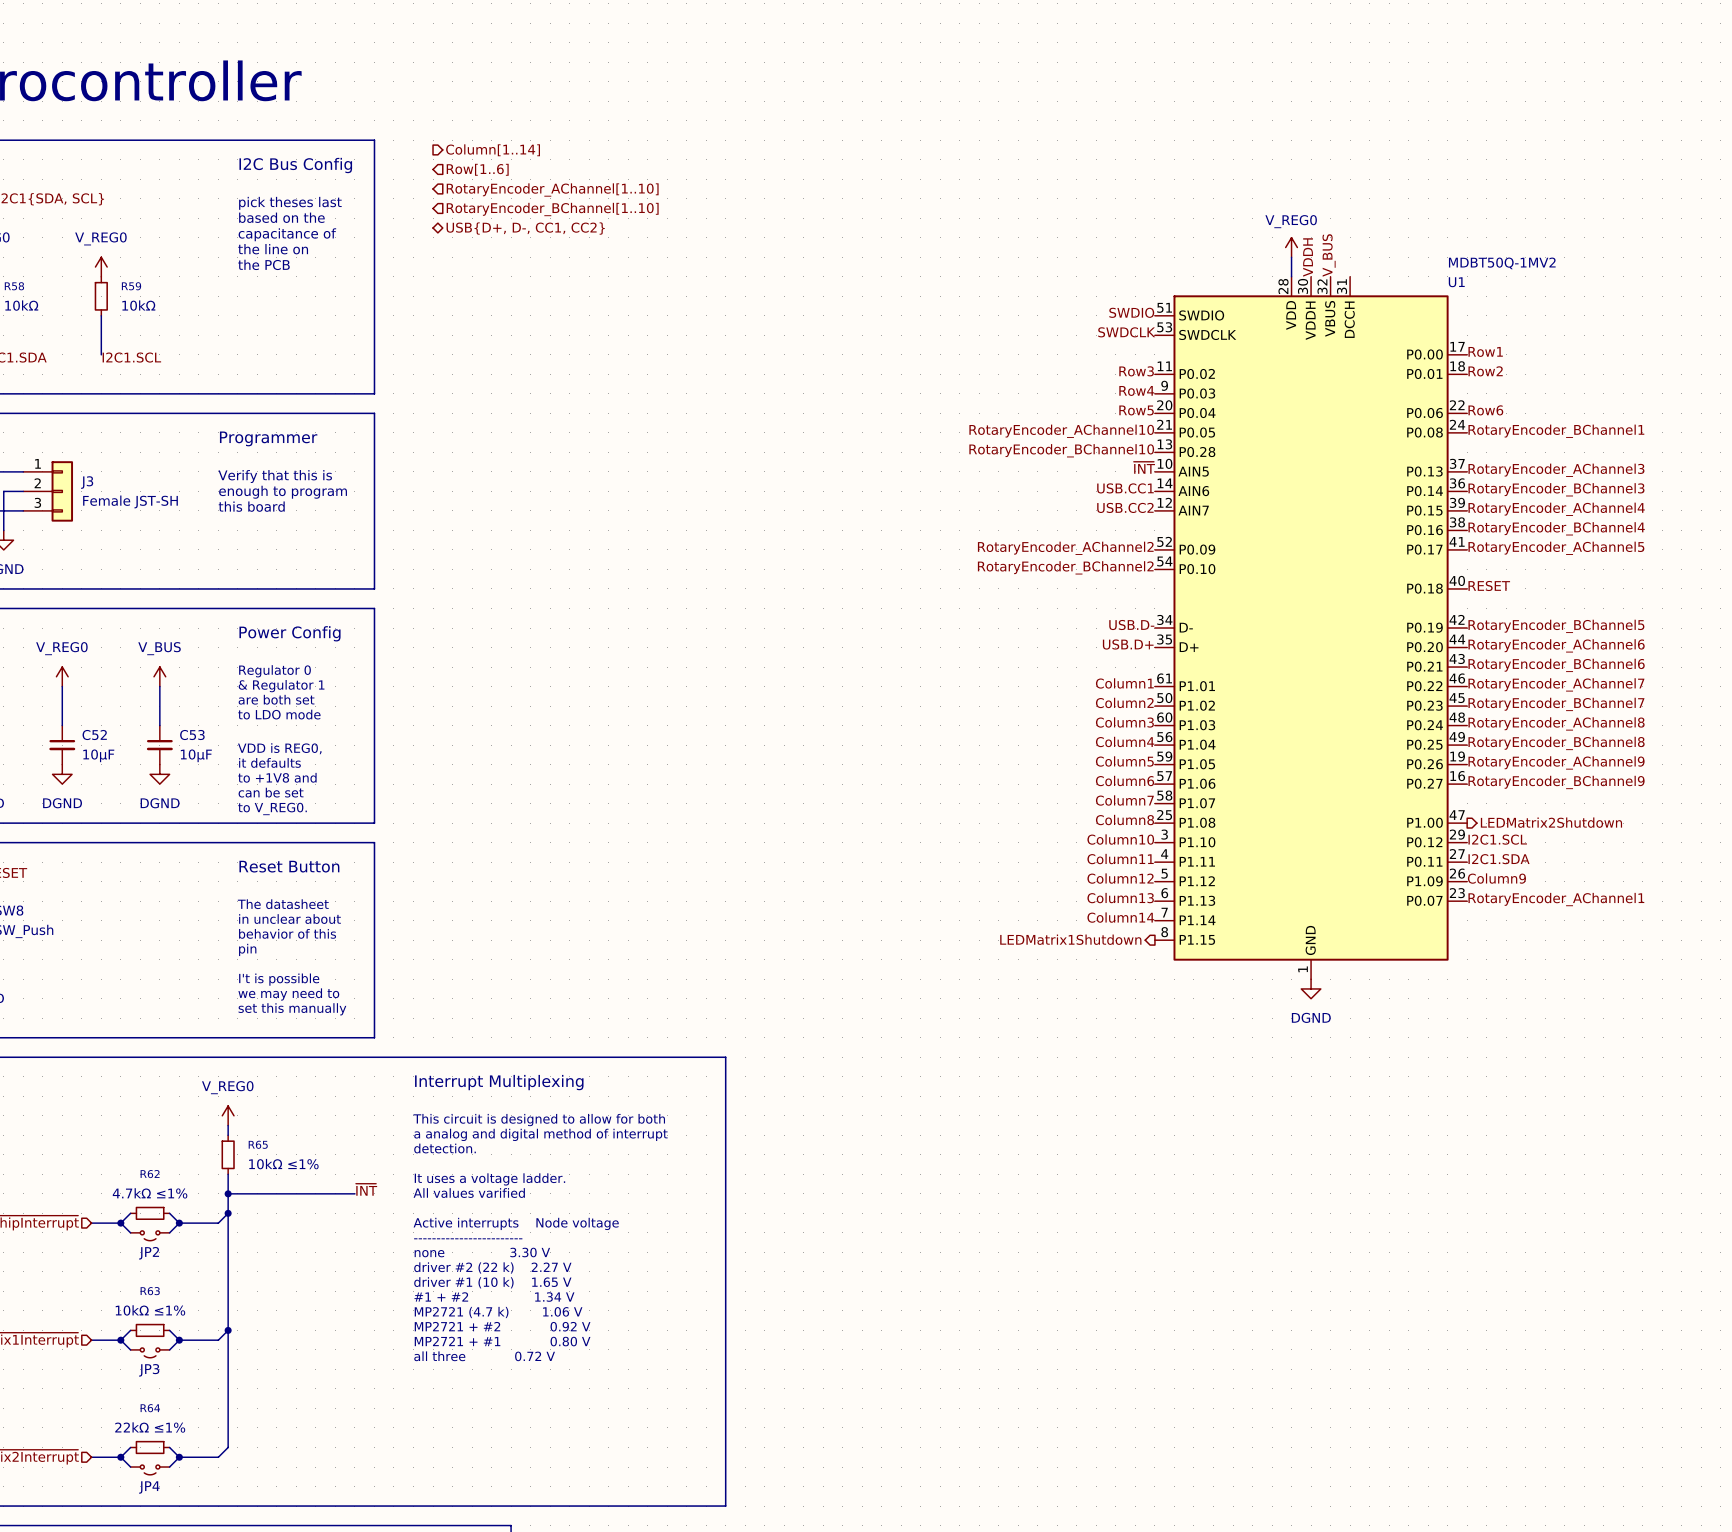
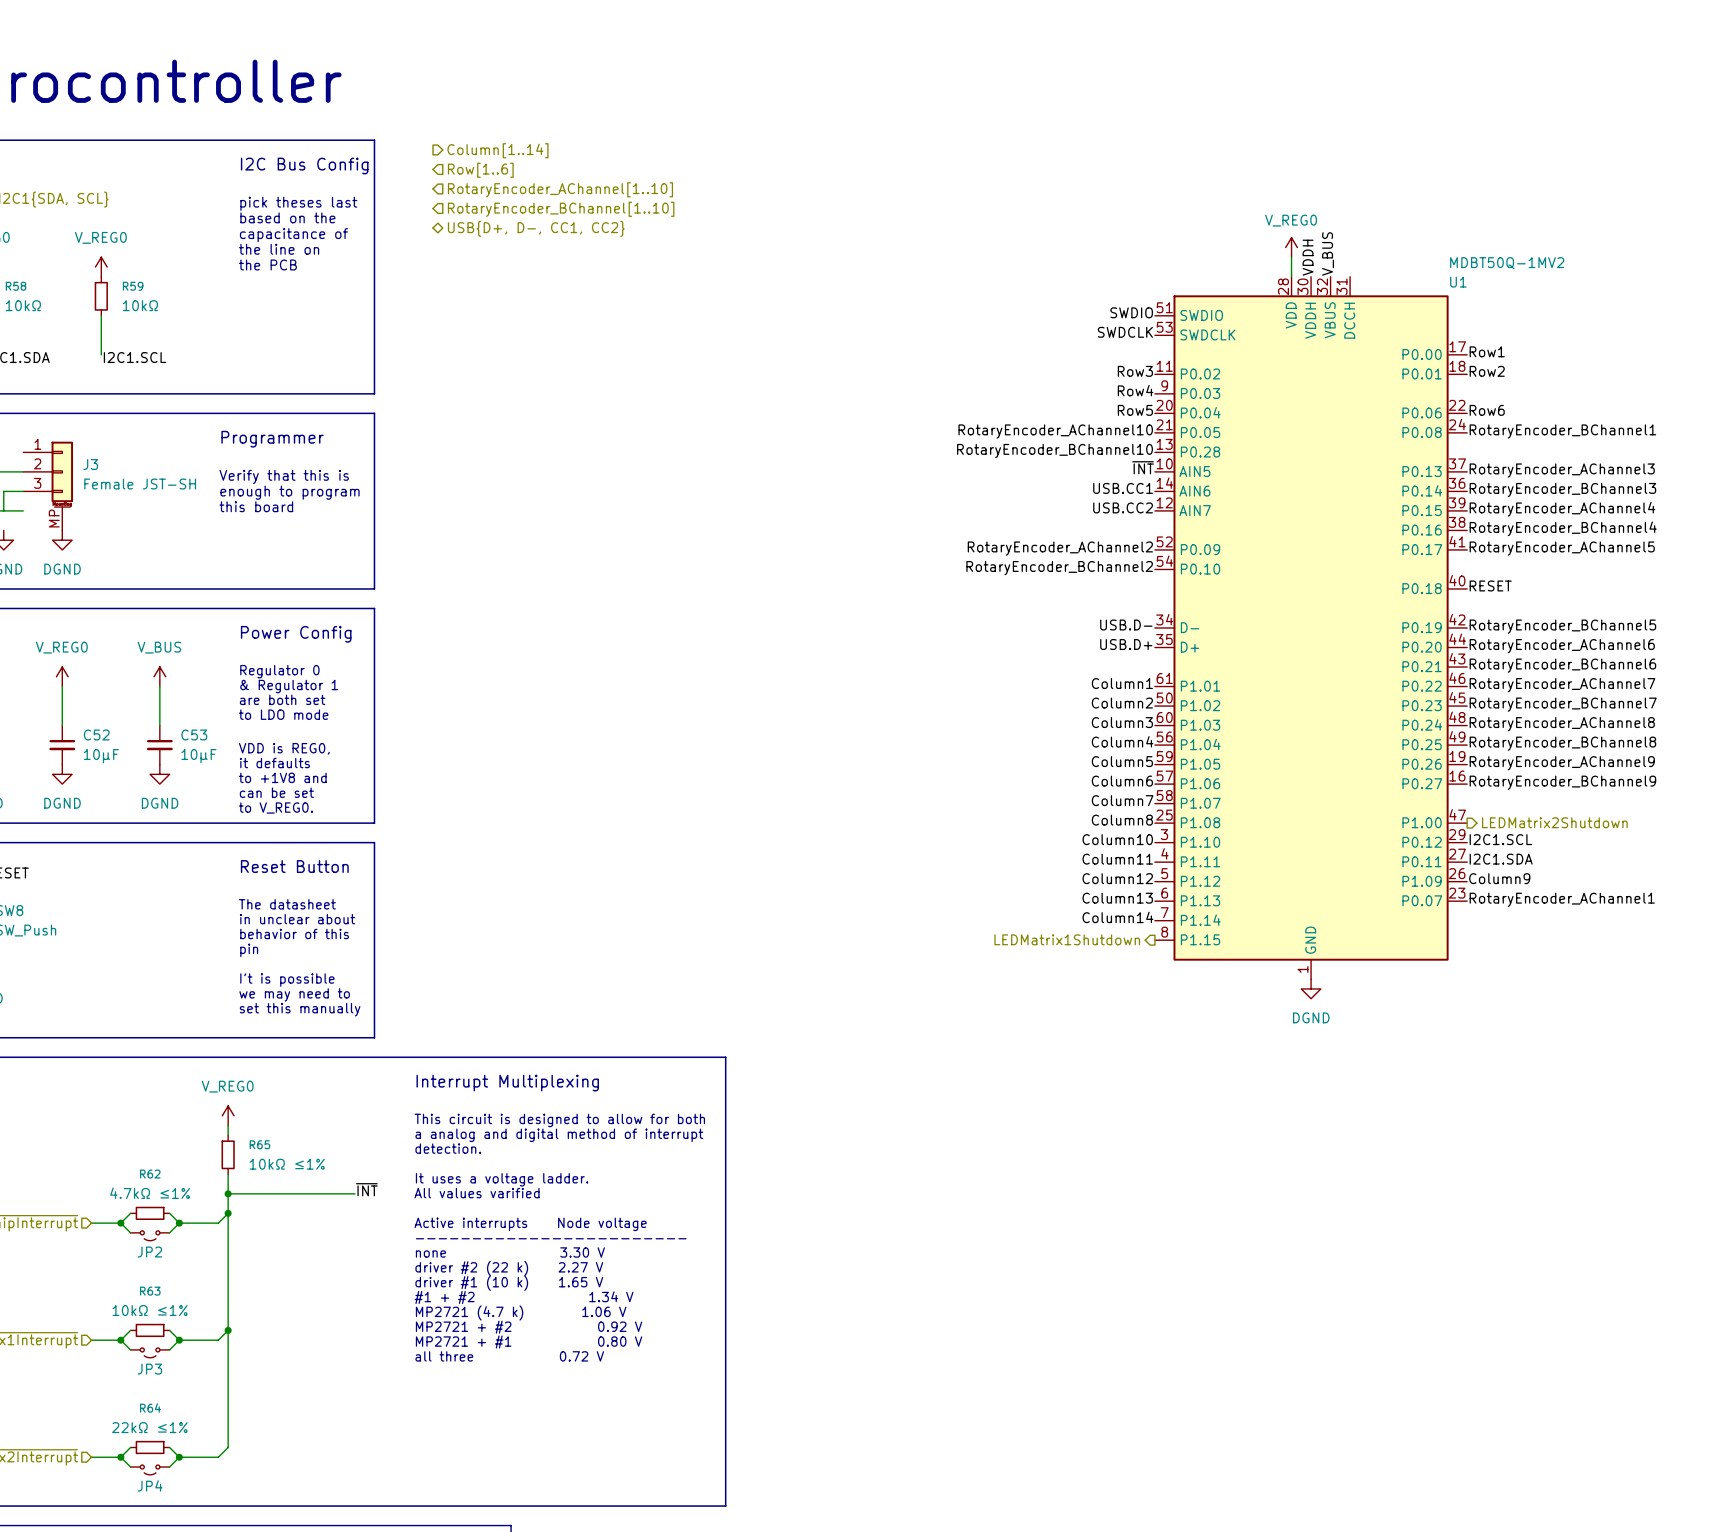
J3 symbol: [23, 461, 74, 522] -> [23, 441, 74, 531]
wire: (3, 510) (3, 530) -> none
power symbol: none -> DGND (62, 540)

